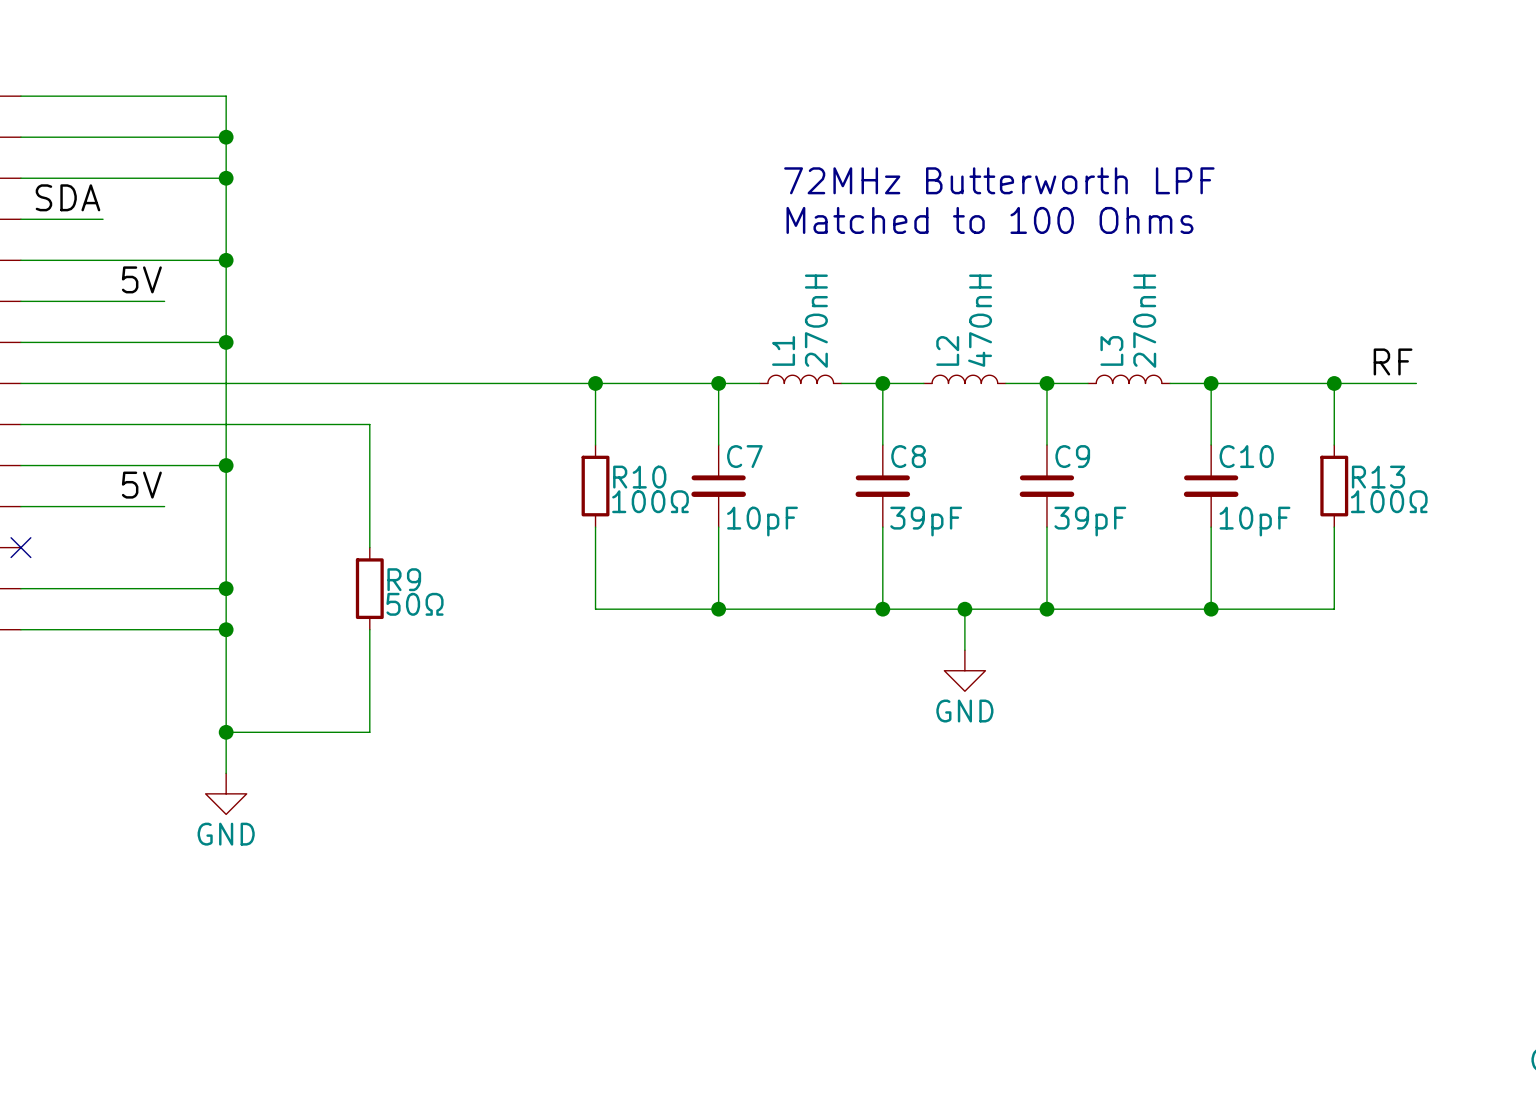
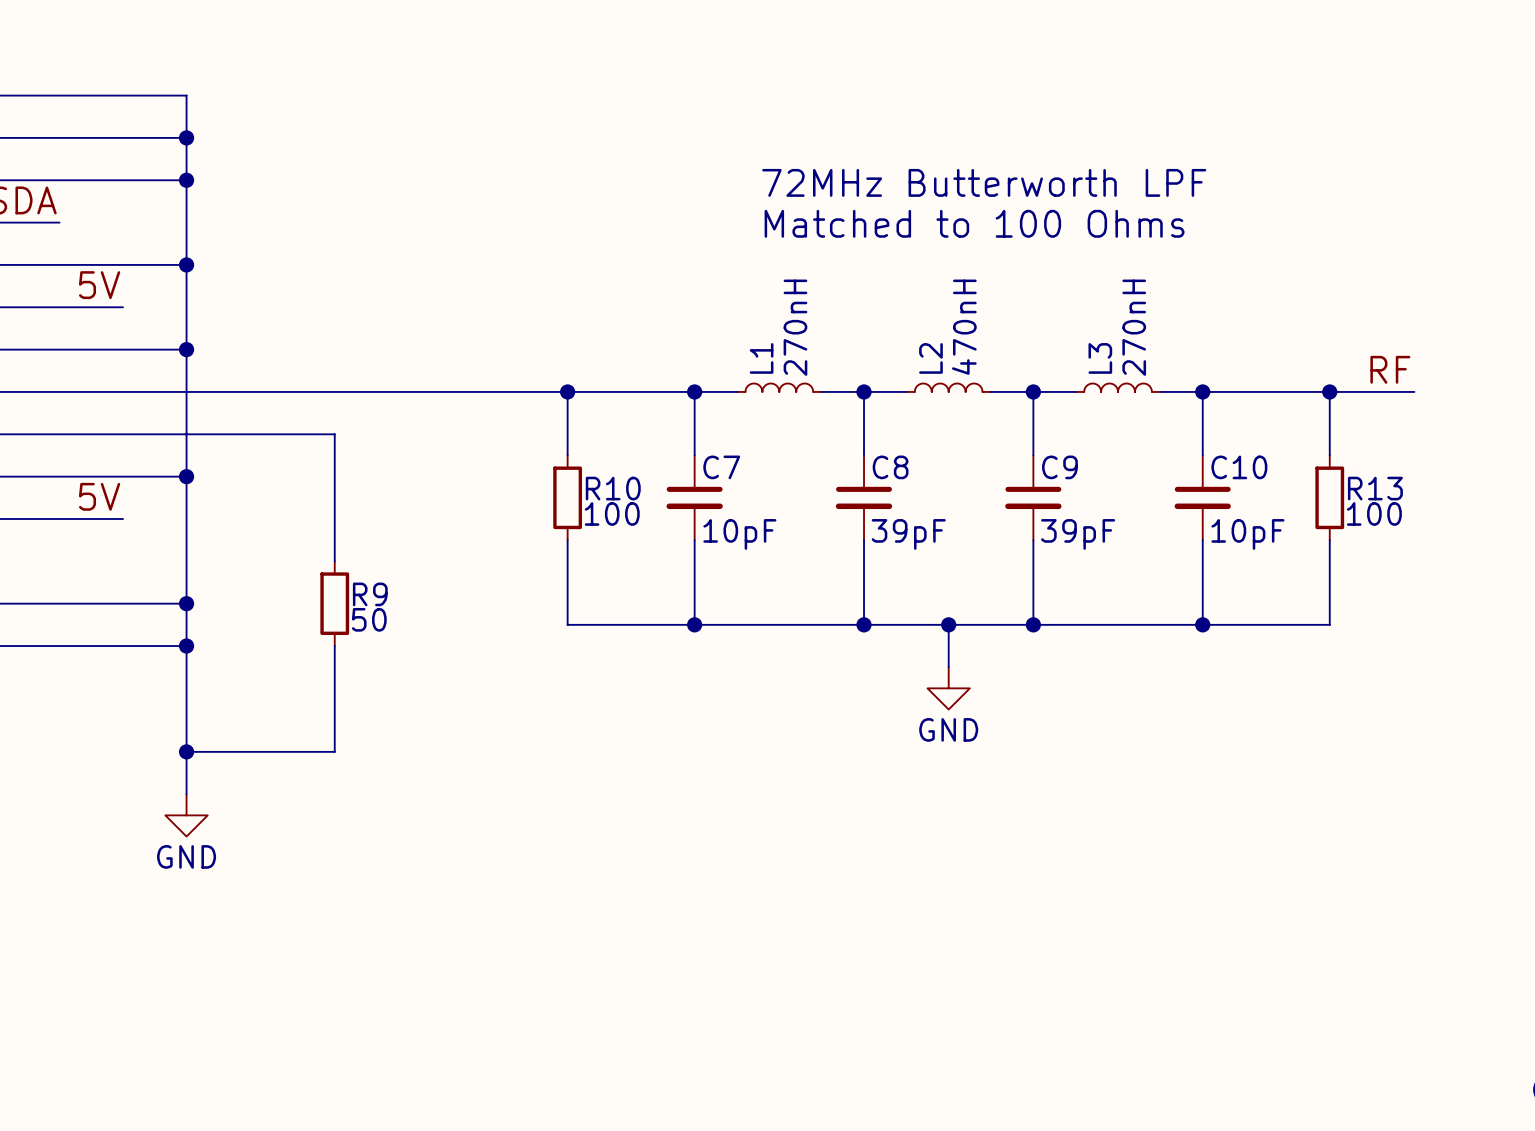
R10 value: 100Ω (650, 501) -> 100 (612, 513)
R13 value: 100Ω (1389, 501) -> 100 (1374, 513)
R9 value: 50Ω (415, 604) -> 50 (369, 619)

